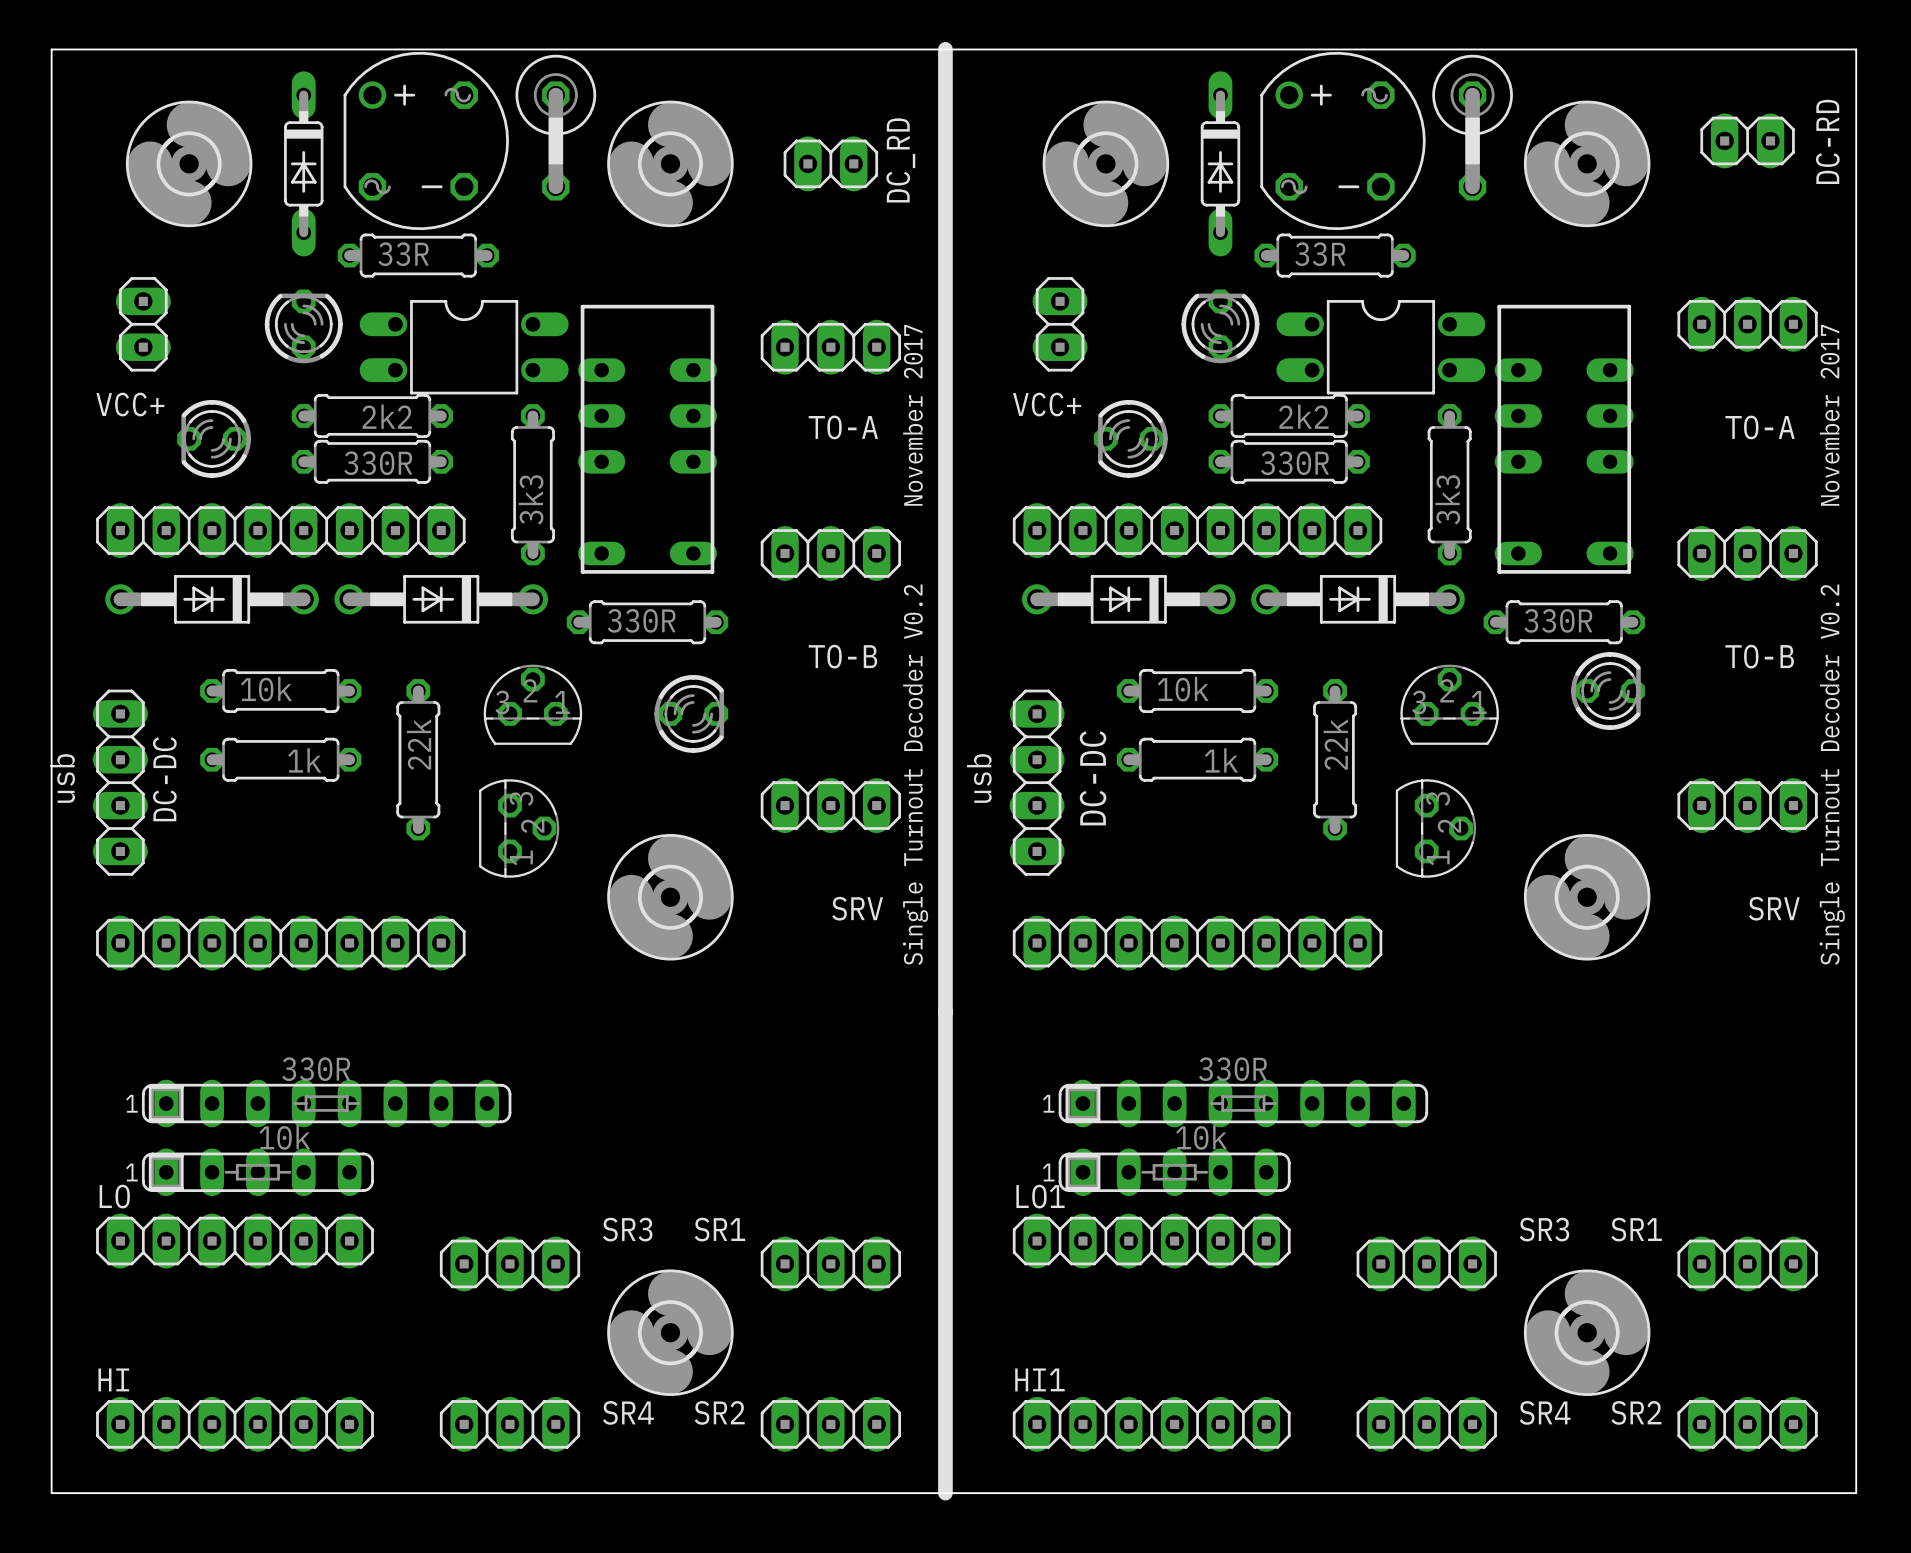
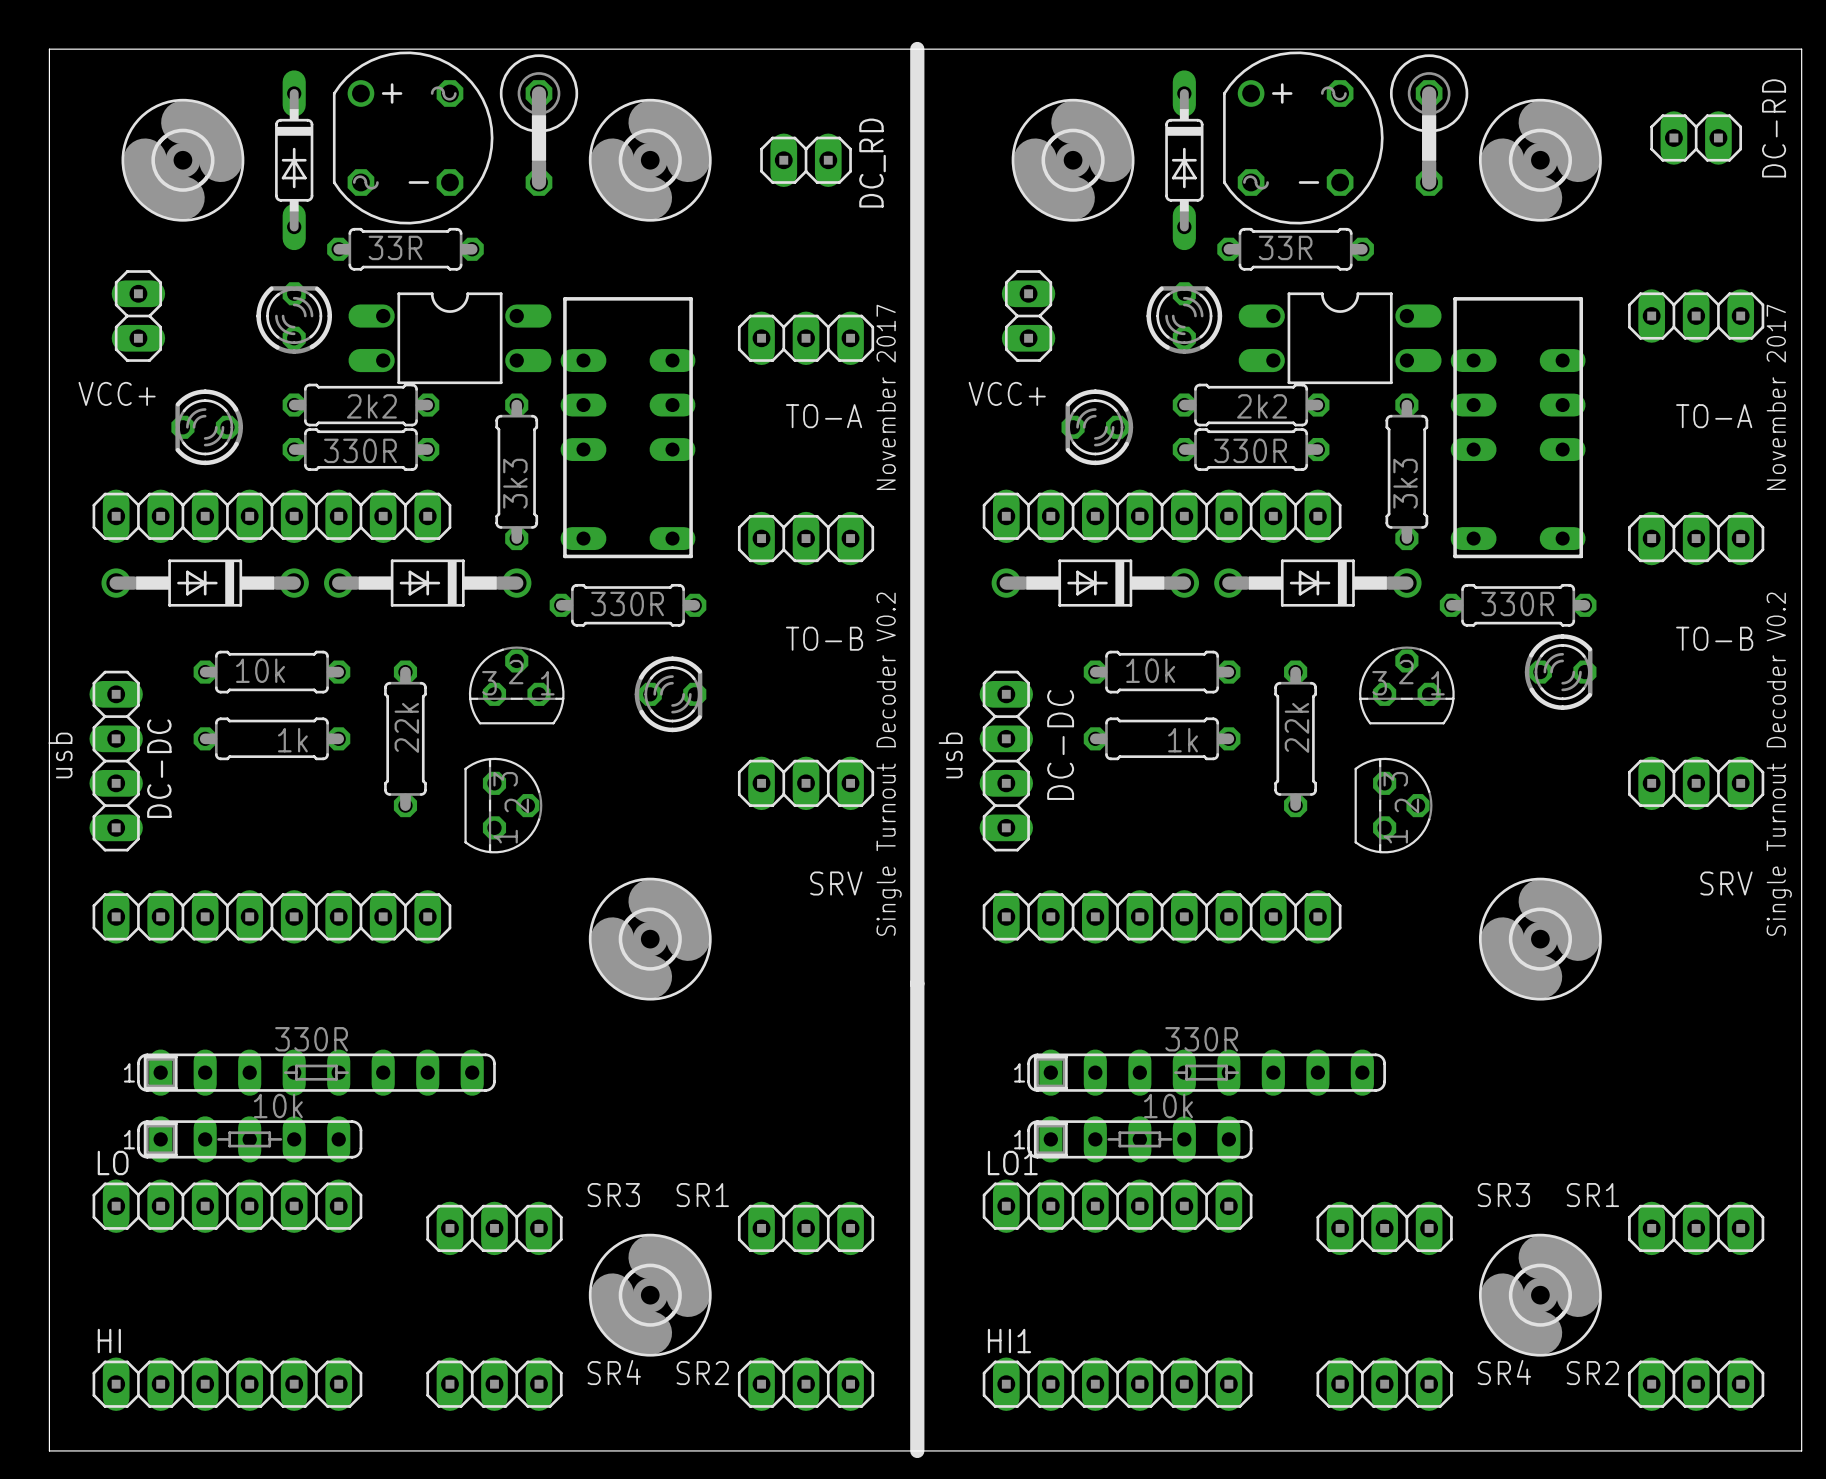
part position: (670, 897) -> (650, 939)
part position: (1587, 897) -> (1540, 939)

